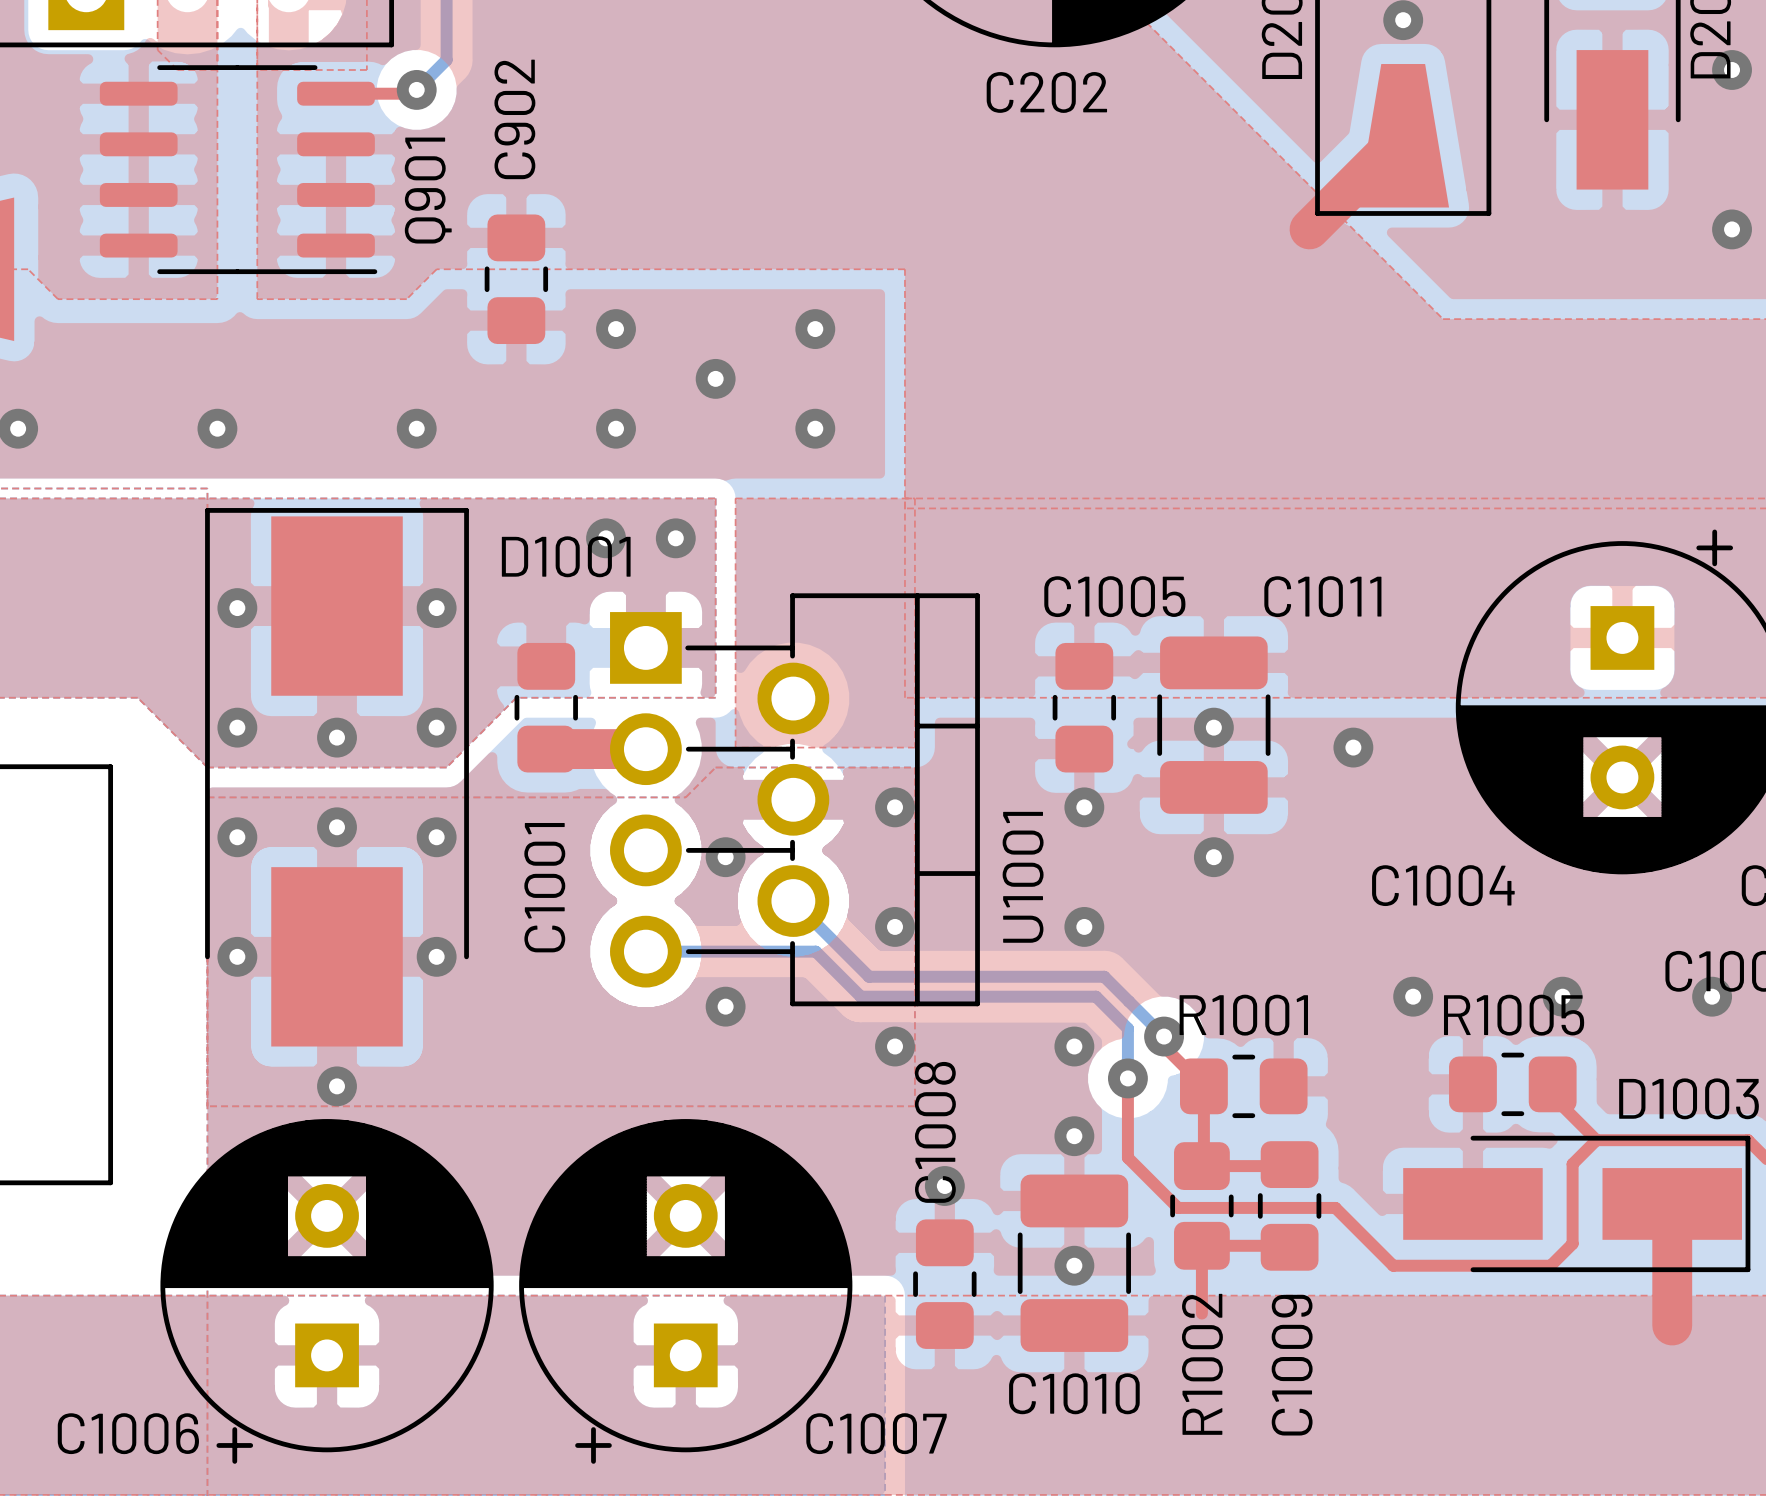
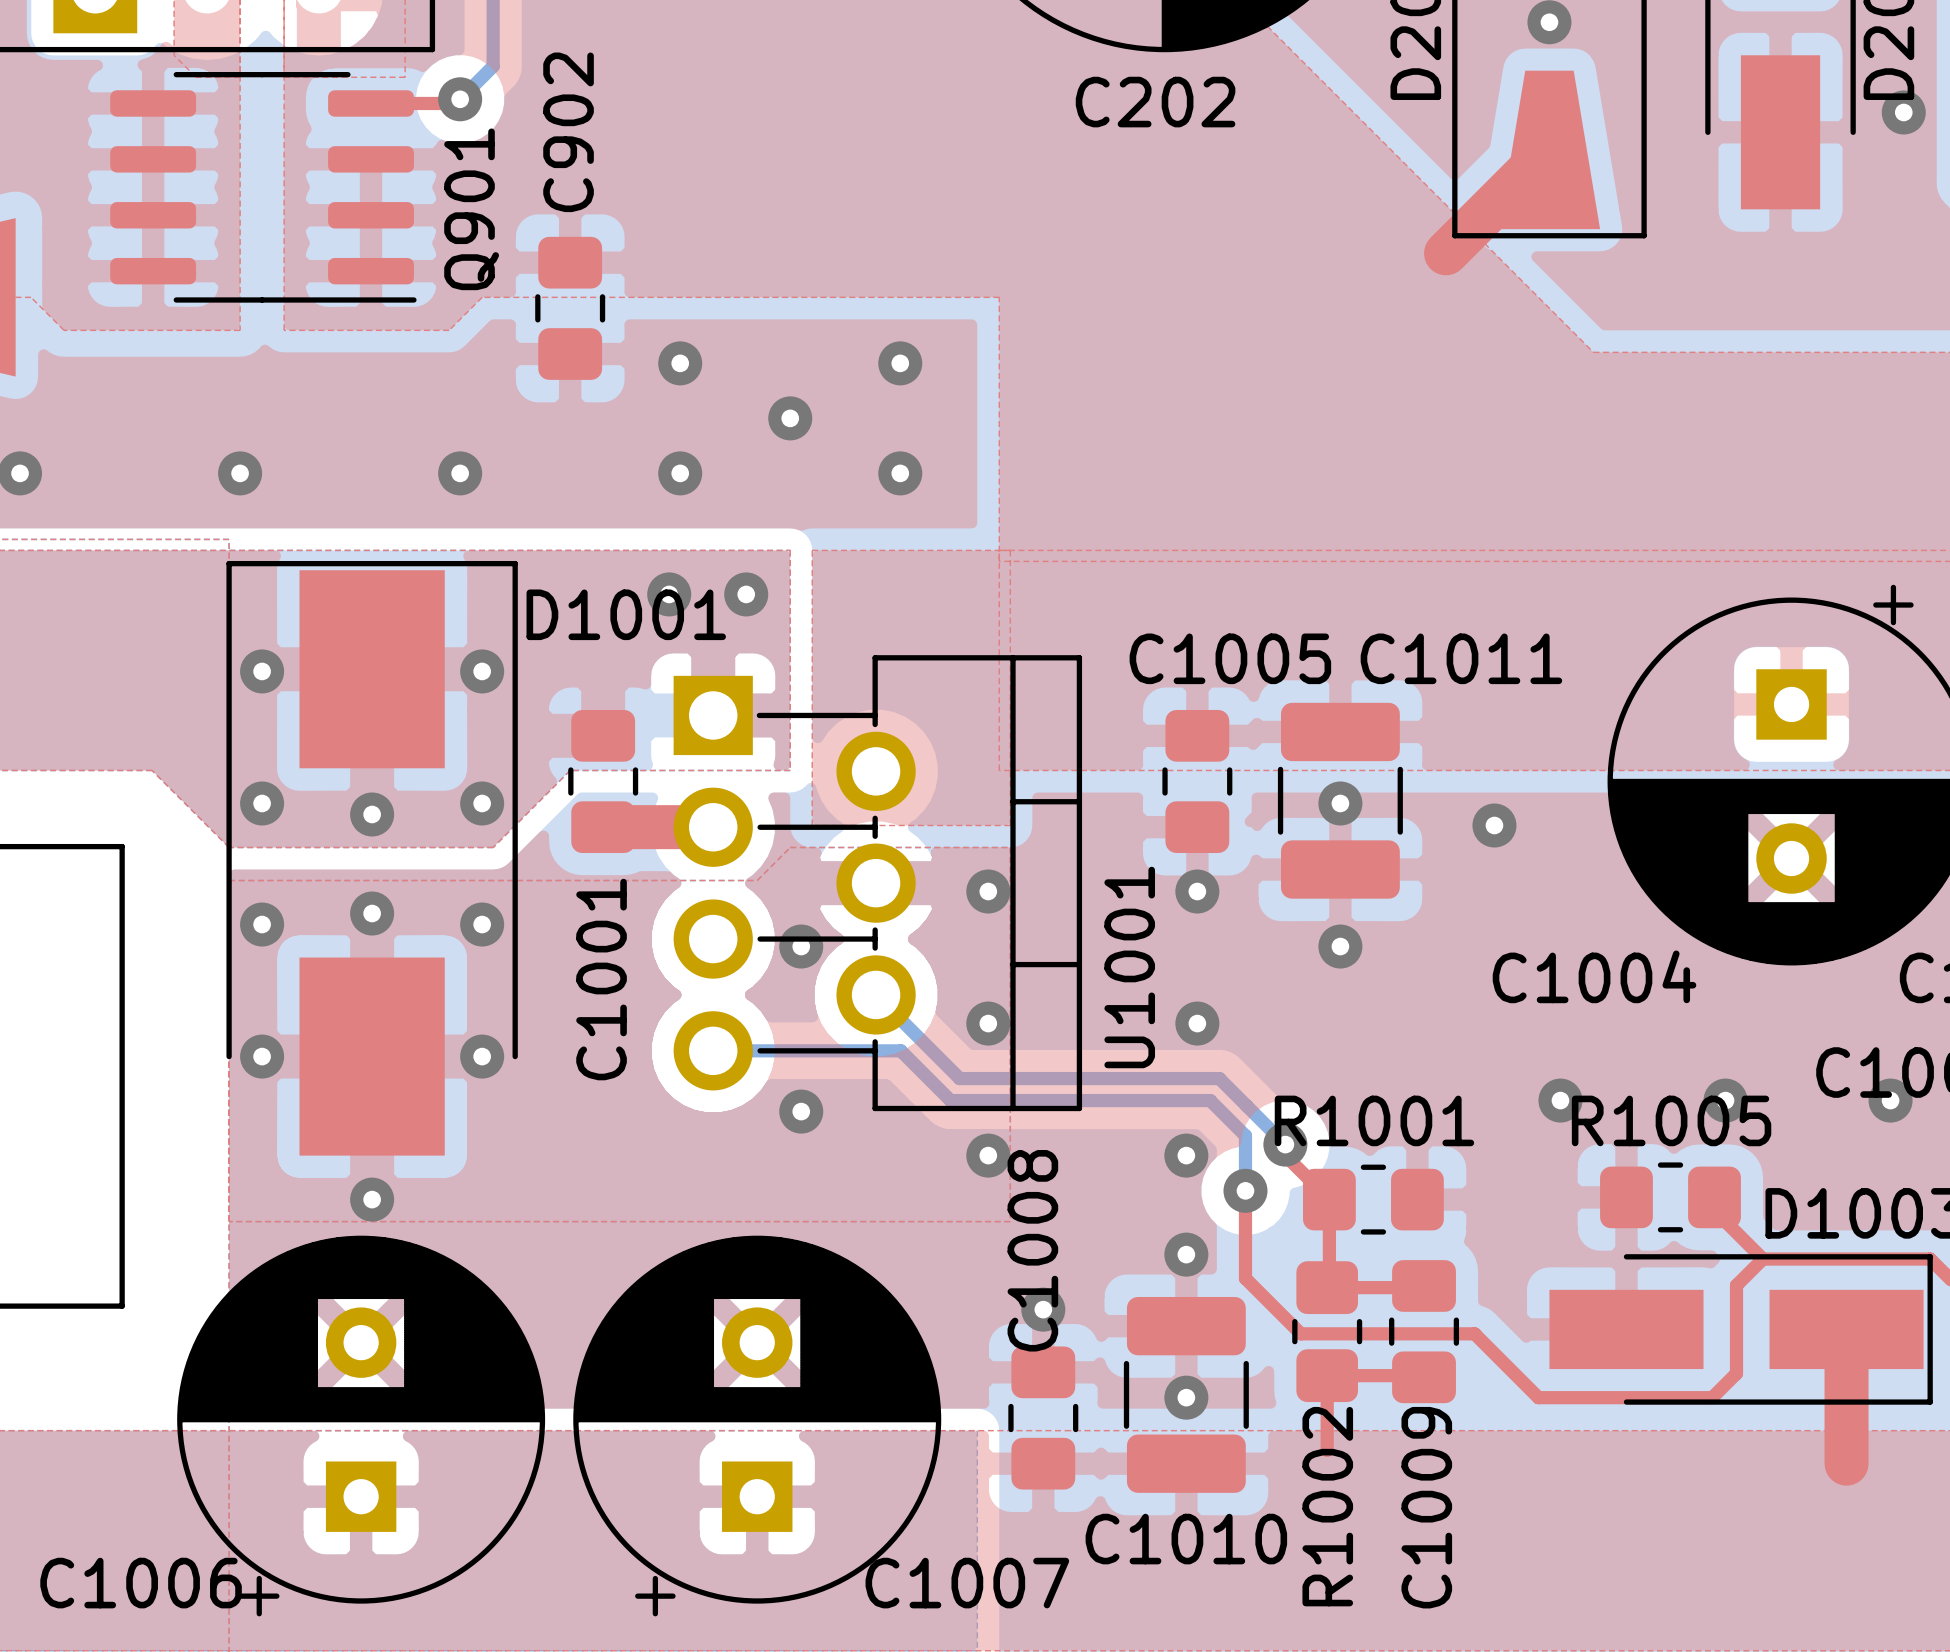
via position: (1732, 69) -> (1903, 112)
via: (1732, 229) -> none

